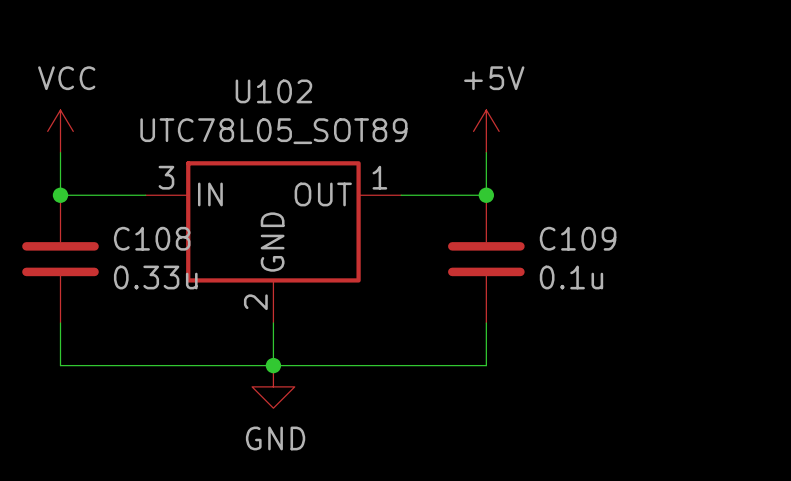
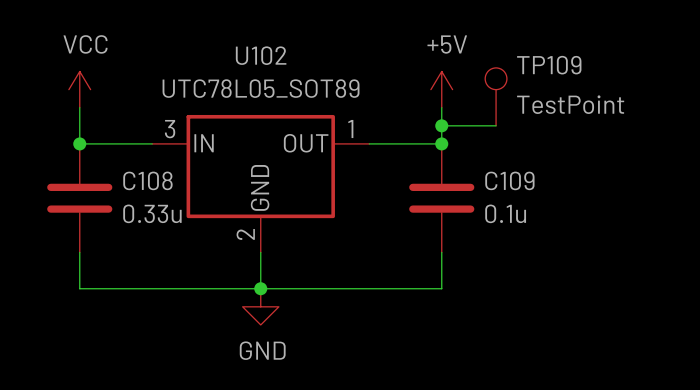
TP109: none -> TestPoint (496, 96)
wire: none -> (441, 125) (496, 125)
junction: none -> (441, 125)

